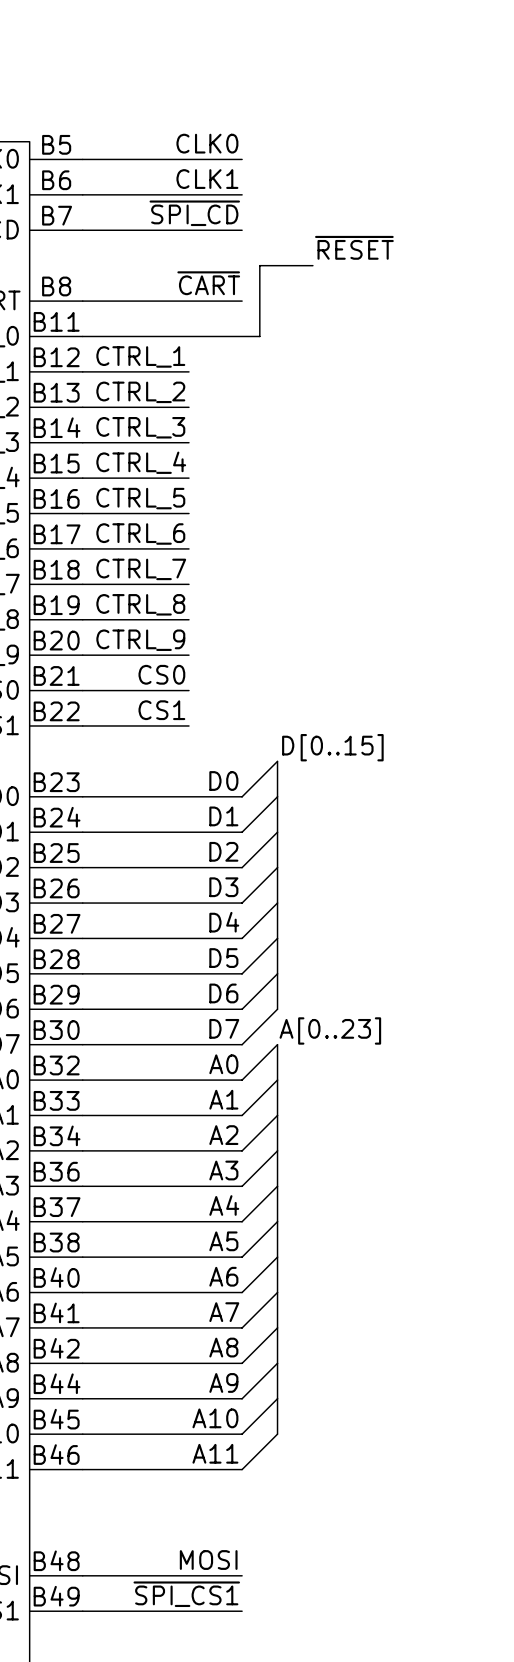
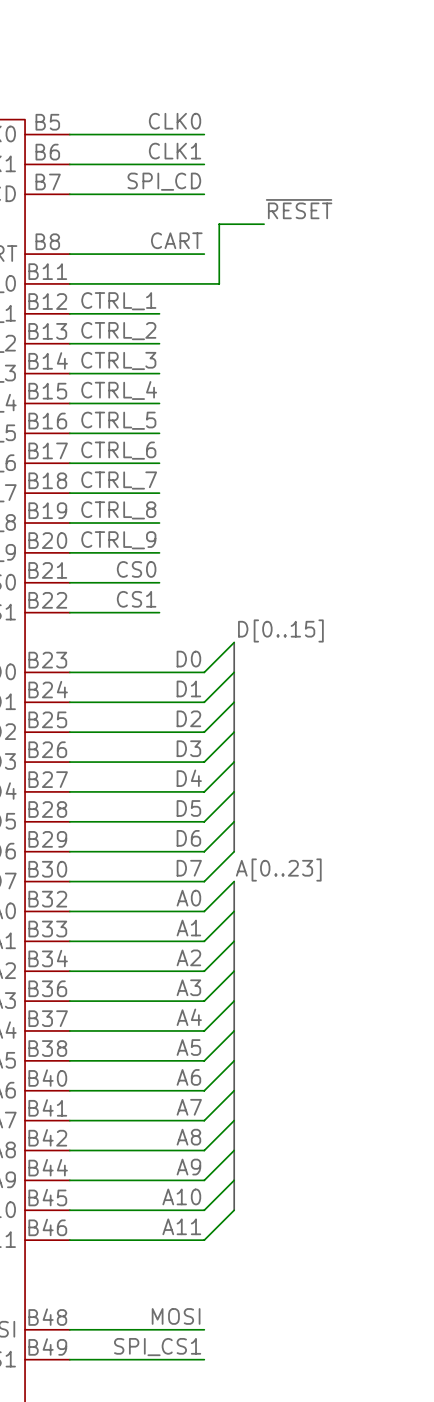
label: ~{SPI_CD} (194, 213) -> SPI_CD (164, 181)
label: ~{CART} (208, 283) -> CART (176, 240)
label: ~{SPI_CS1} (186, 1594) -> SPI_CS1 (157, 1347)

